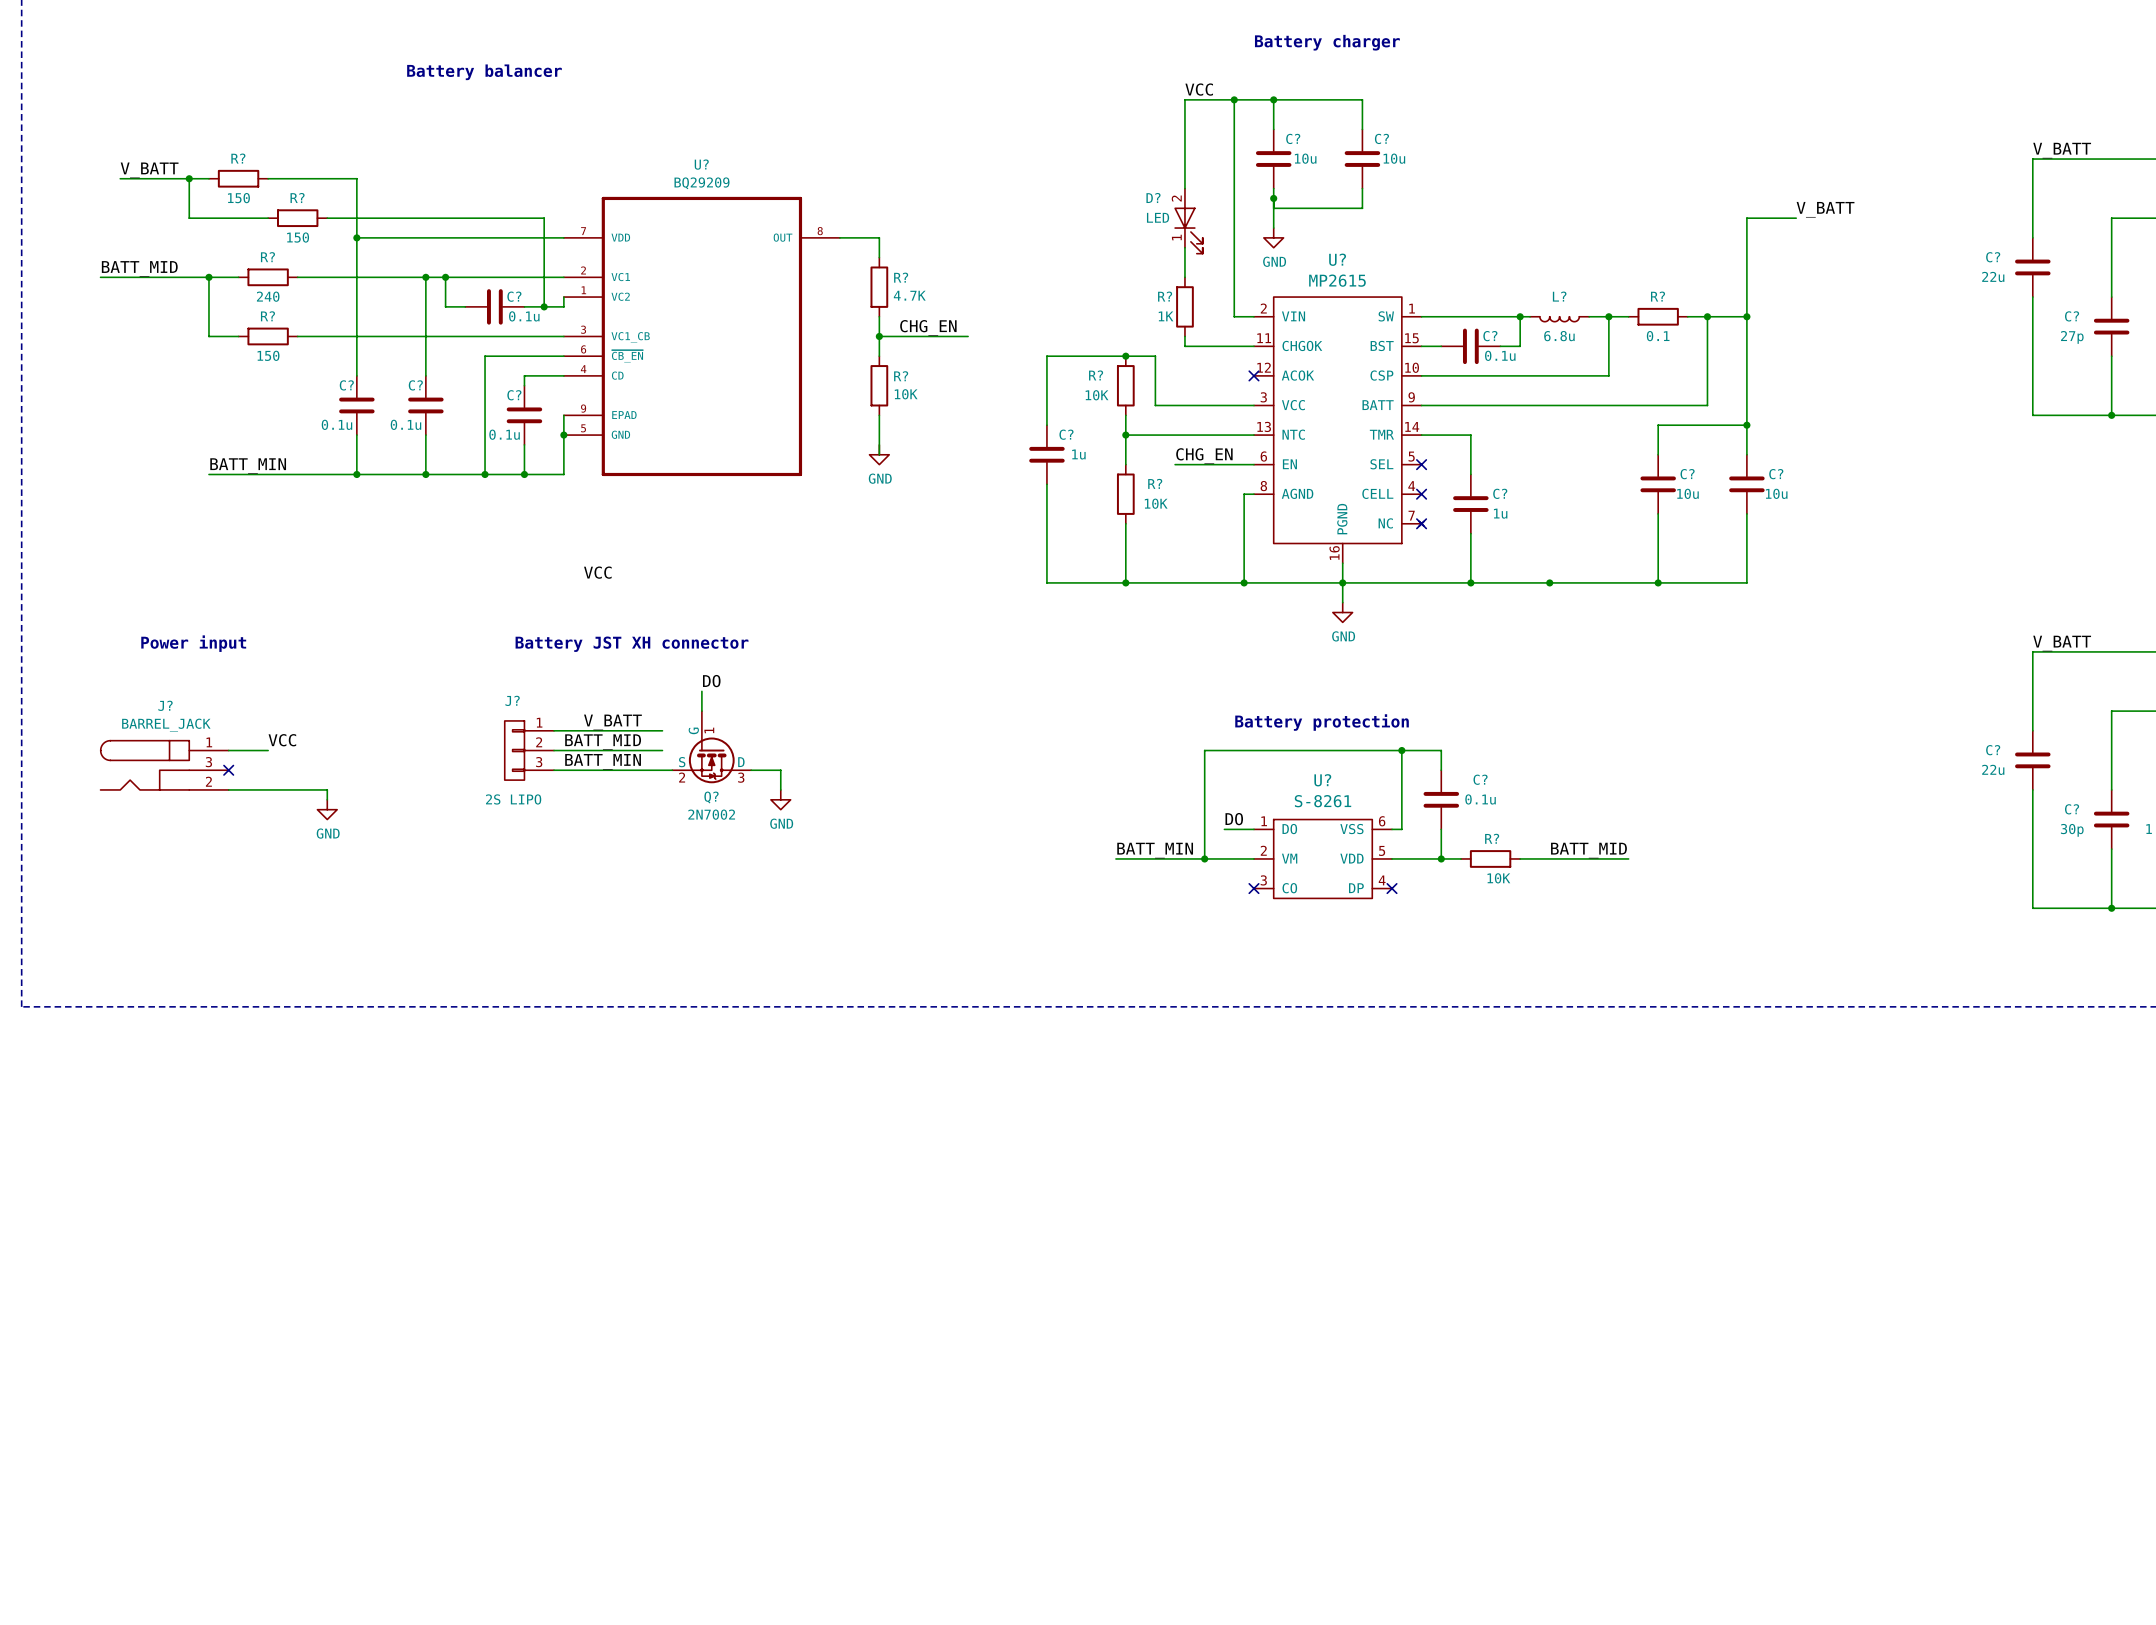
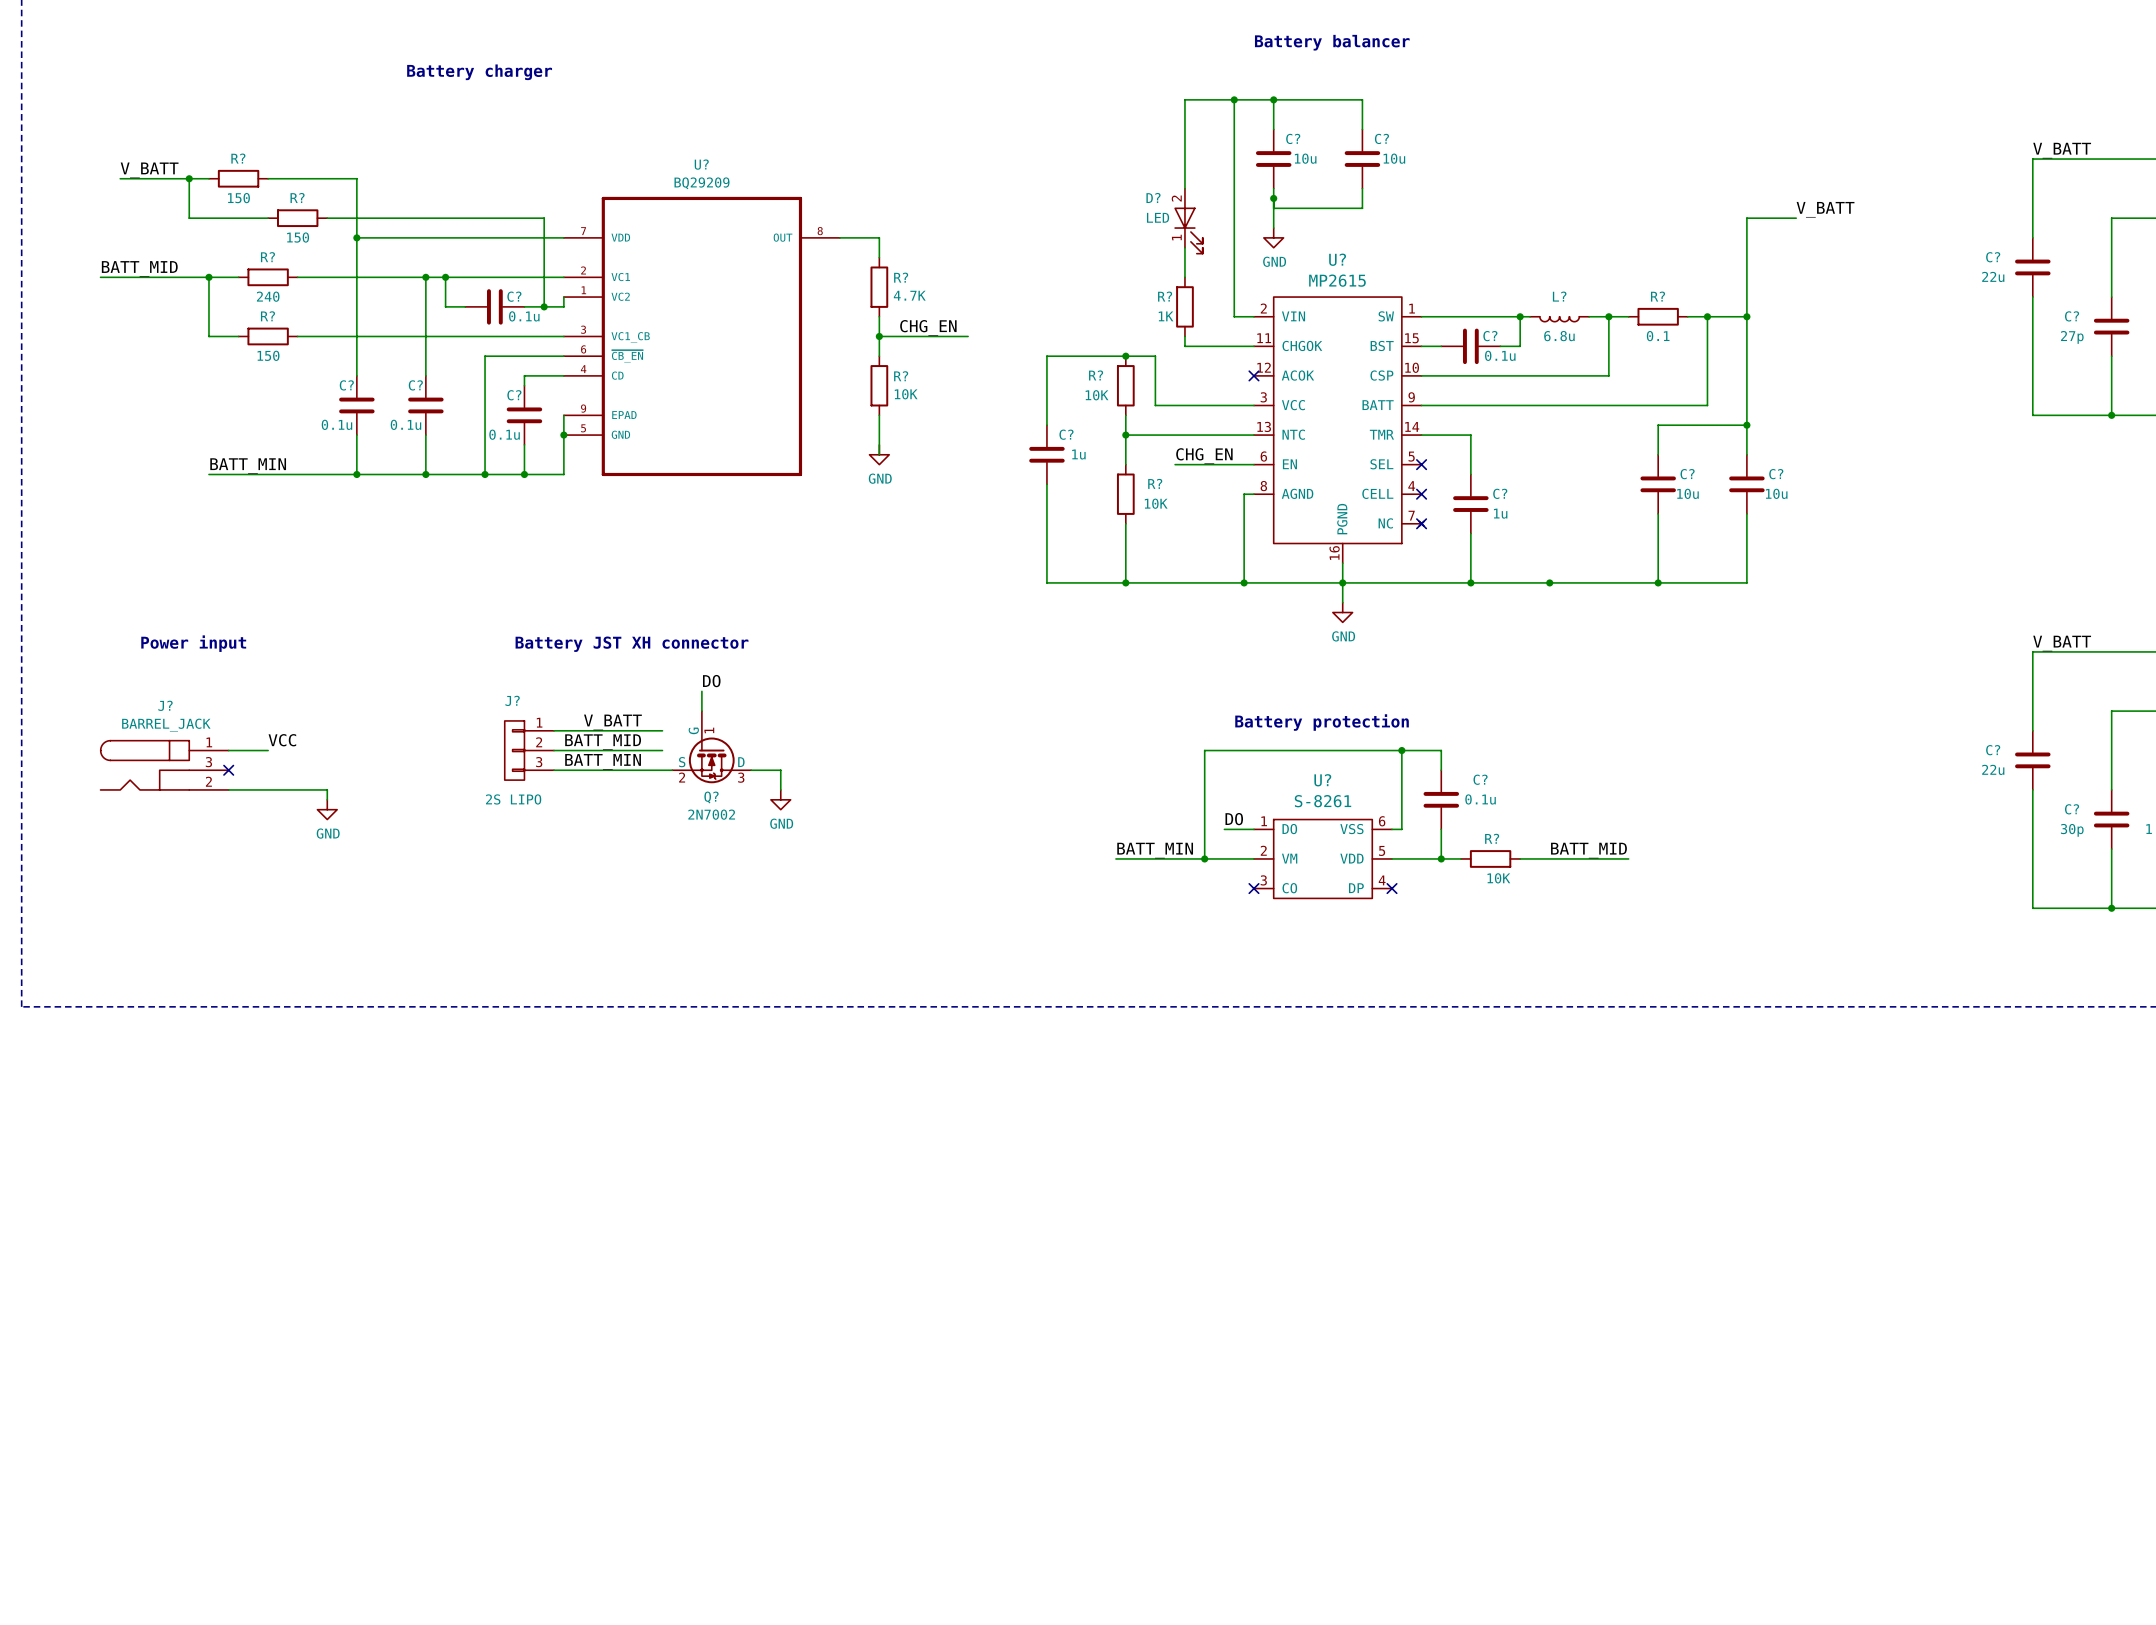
text: Battery charger (1327, 42) -> Battery balancer (1332, 42)
text: Battery balancer (484, 72) -> Battery charger (479, 72)
label: VCC (1199, 89) -> none
label: VCC (597, 572) -> none

